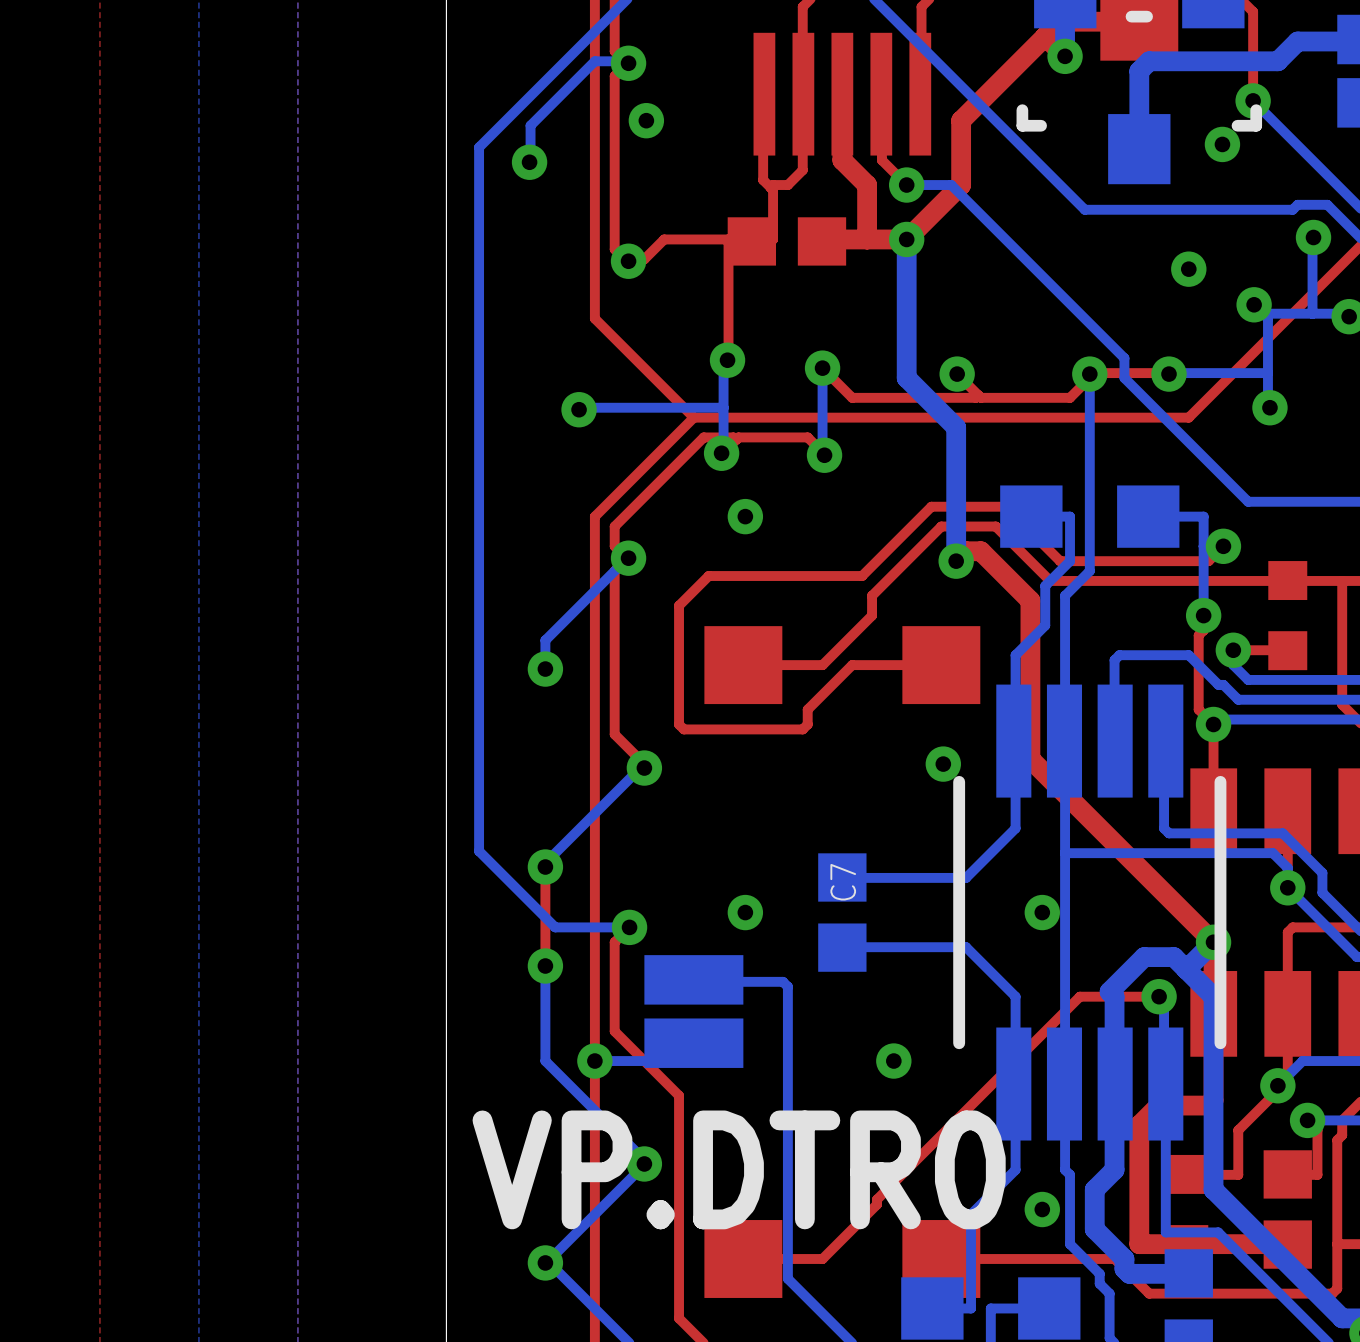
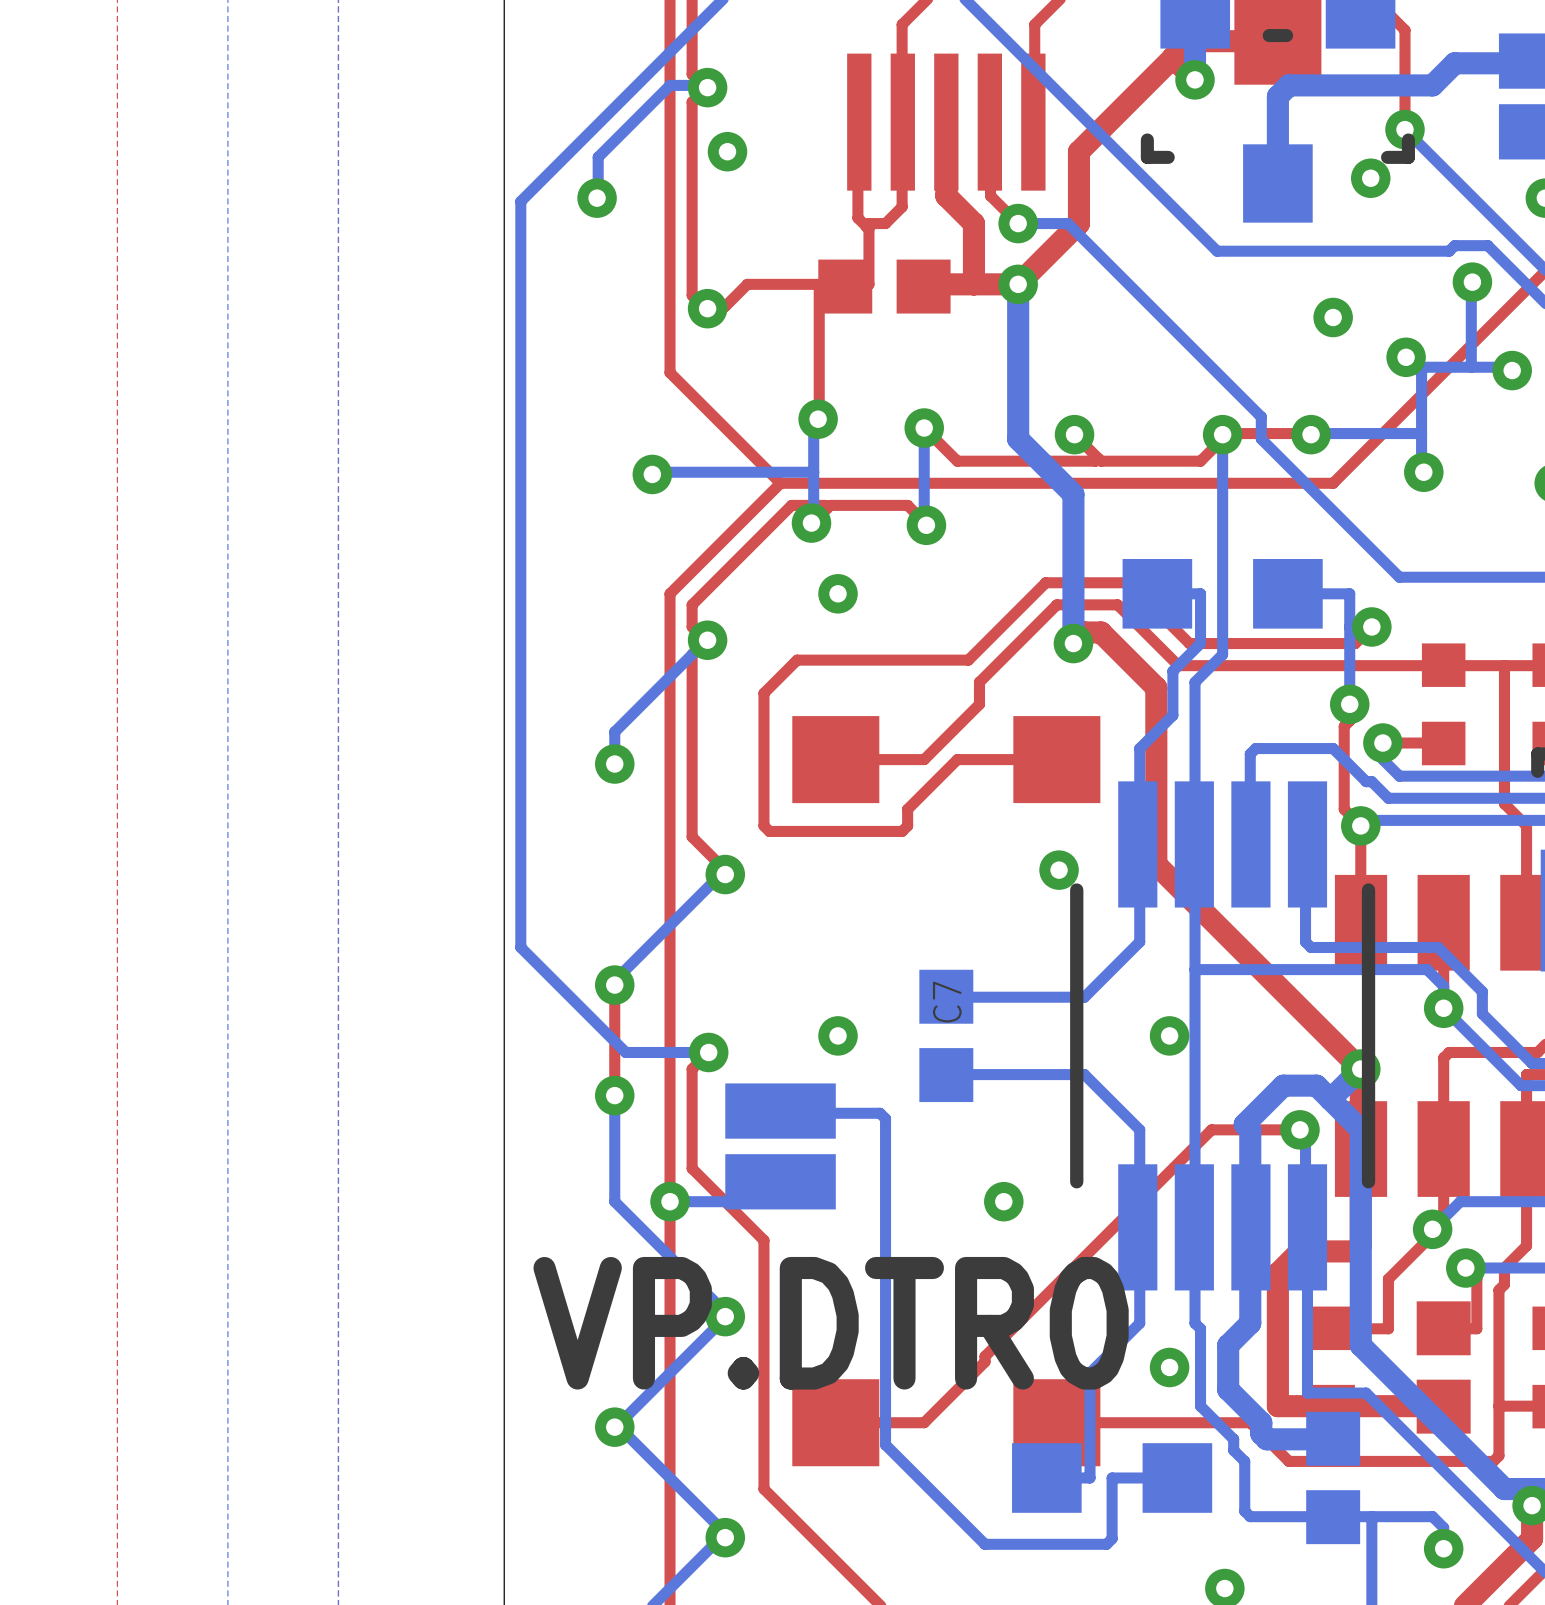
bottom track: (479, 147) (479, 851) -> (540, 181) (520, 201) (520, 947) (540, 967)

